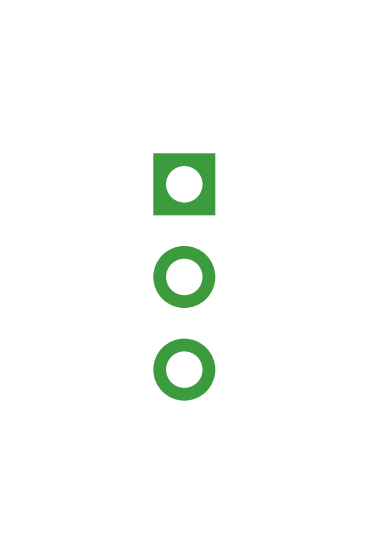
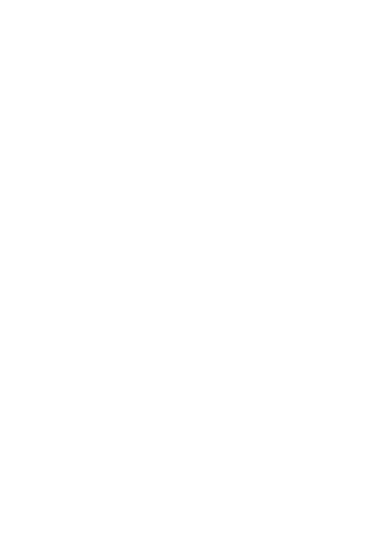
part: (184, 276) -> none

